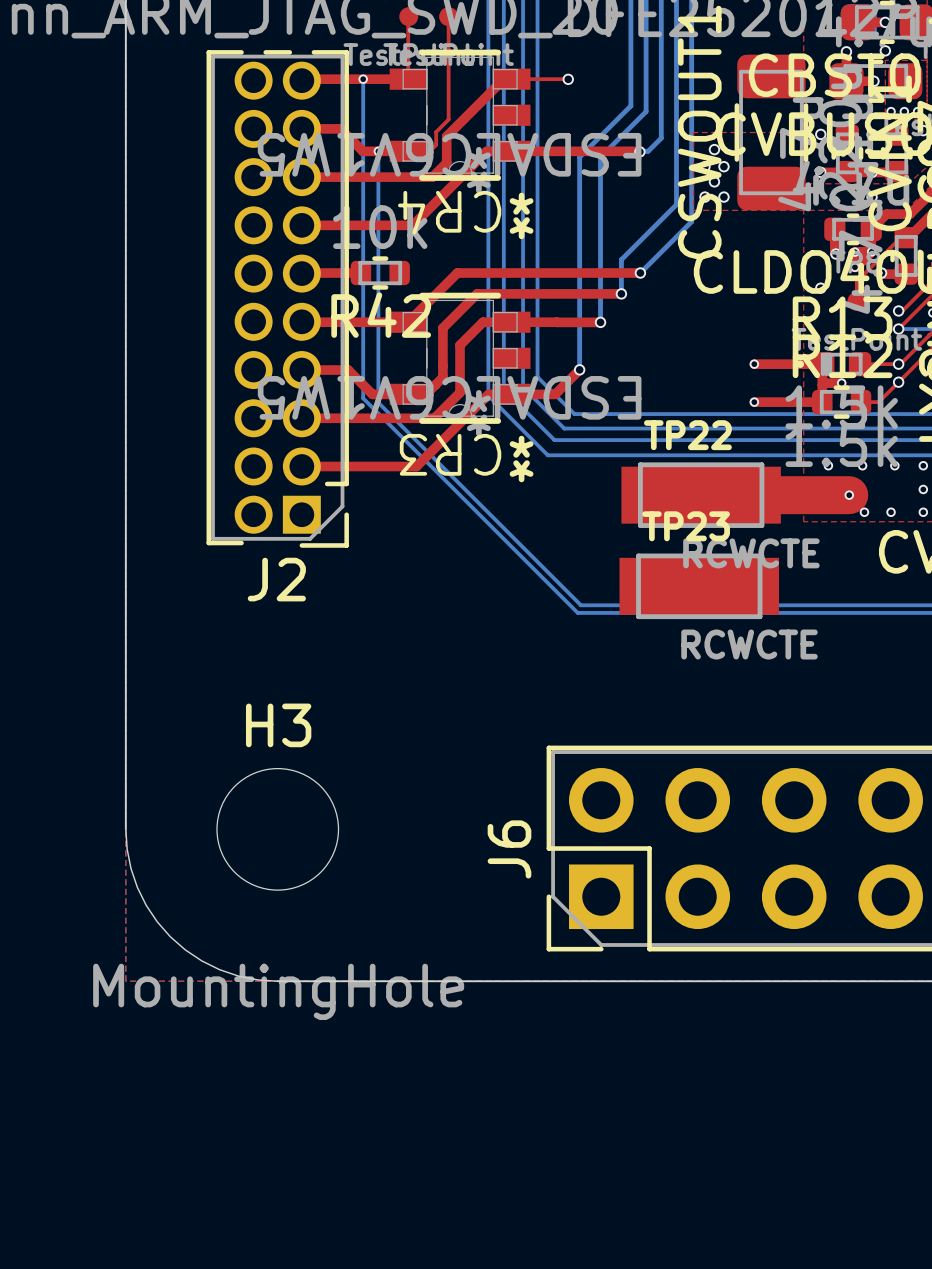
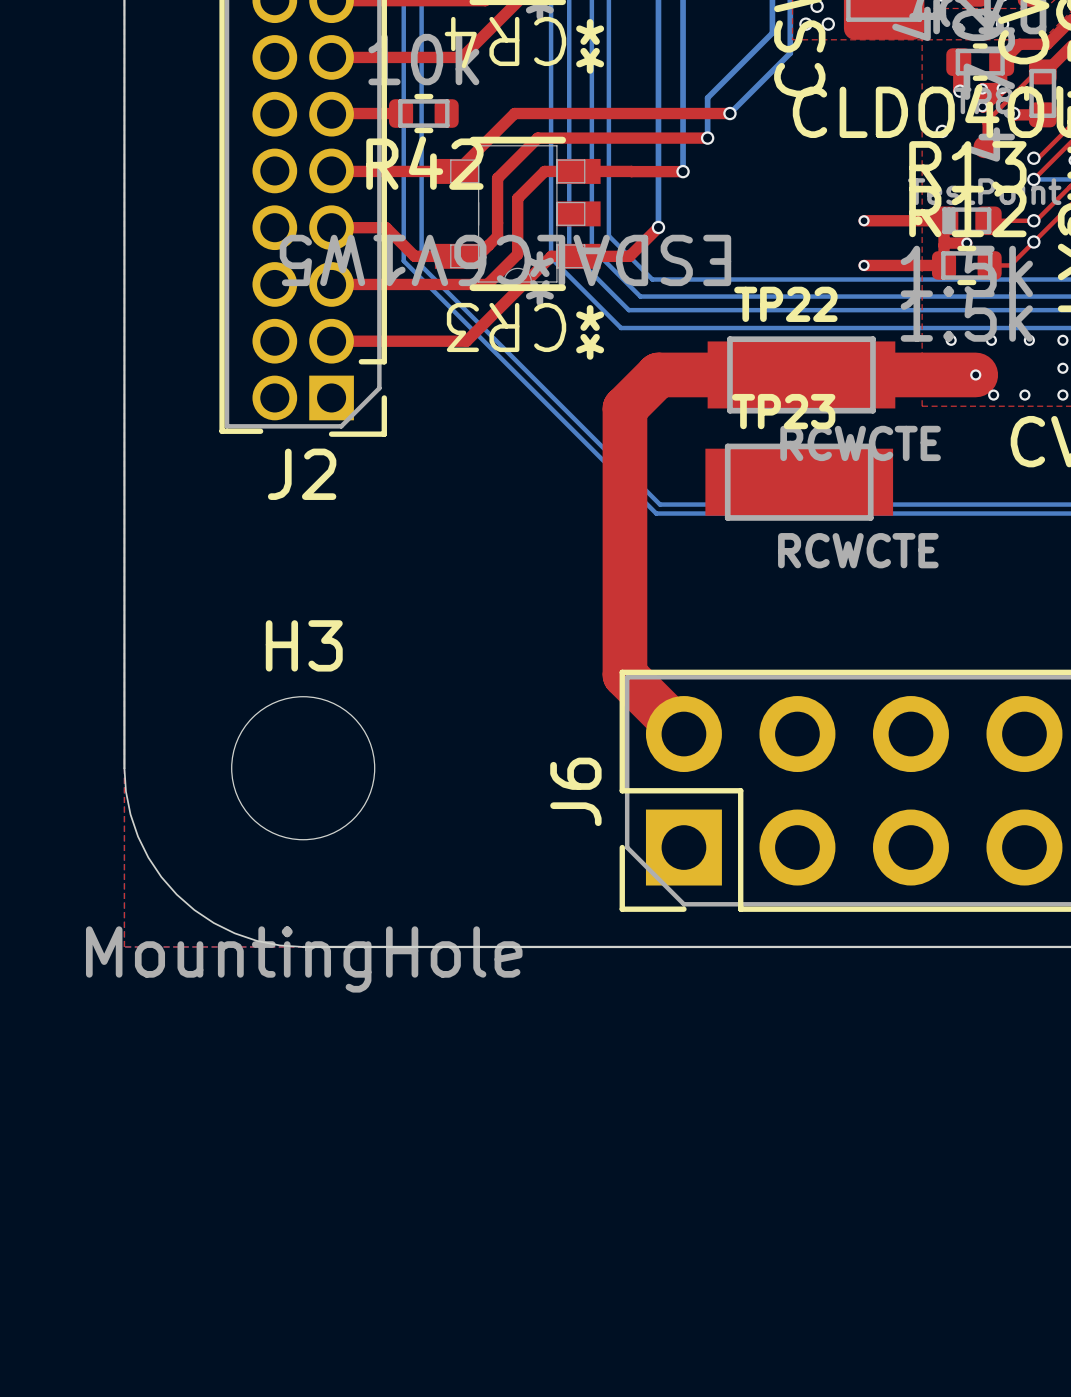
top track: none -> (801, 374) (658, 374) (624, 408) (624, 675) (683, 734)

